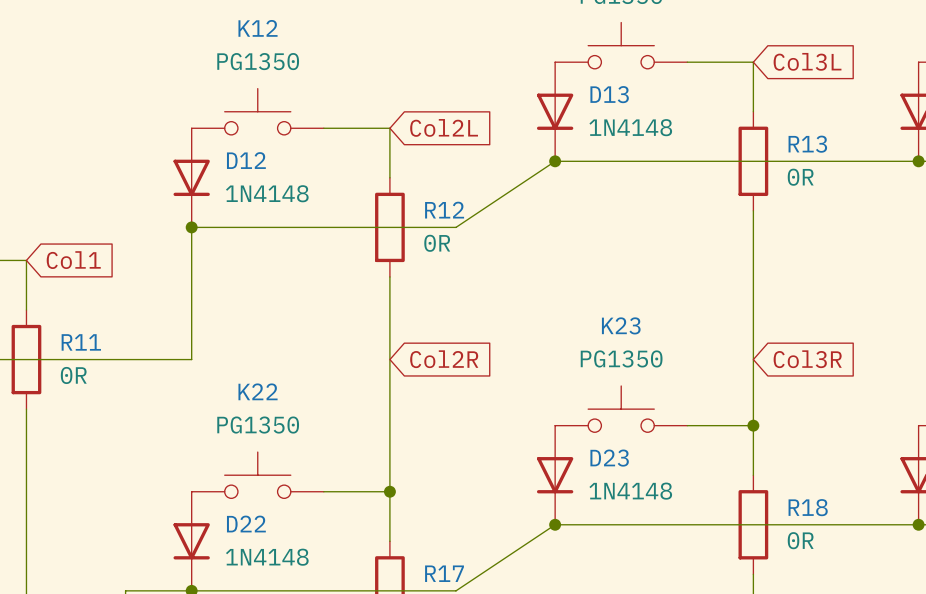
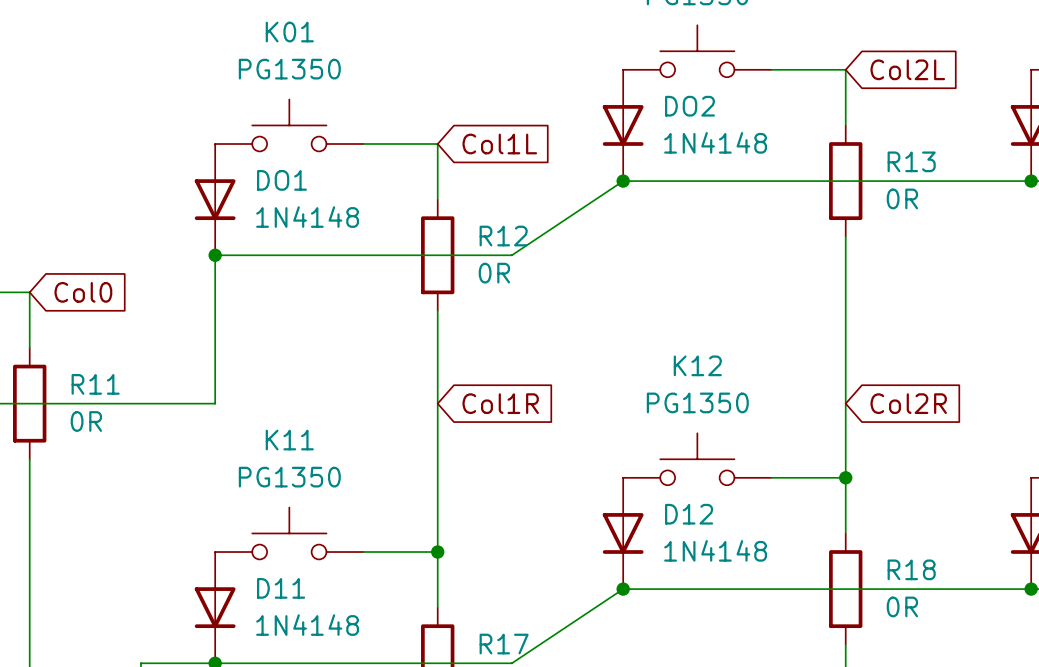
K12 name: K12 (258, 28) -> K01 (289, 32)
global label: Col3L (807, 61) -> Col2L (907, 69)
D13 name: D13 (609, 94) -> DO2 (689, 106)
global label: Col2L (444, 127) -> Col1L (499, 144)
D12 name: D12 (246, 160) -> DO1 (281, 180)
global label: Col1 (73, 260) -> Col0 (83, 292)
K23 name: K23 (621, 325) -> K12 (697, 365)
global label: Col2R (444, 359) -> Col1R (500, 403)
global label: Col3R (807, 359) -> Col2R (908, 403)
K22 name: K22 (258, 391) -> K11 (289, 440)
D23 name: D23 (609, 458) -> D12 (689, 514)
D22 name: D22 (246, 524) -> D11 (281, 588)

